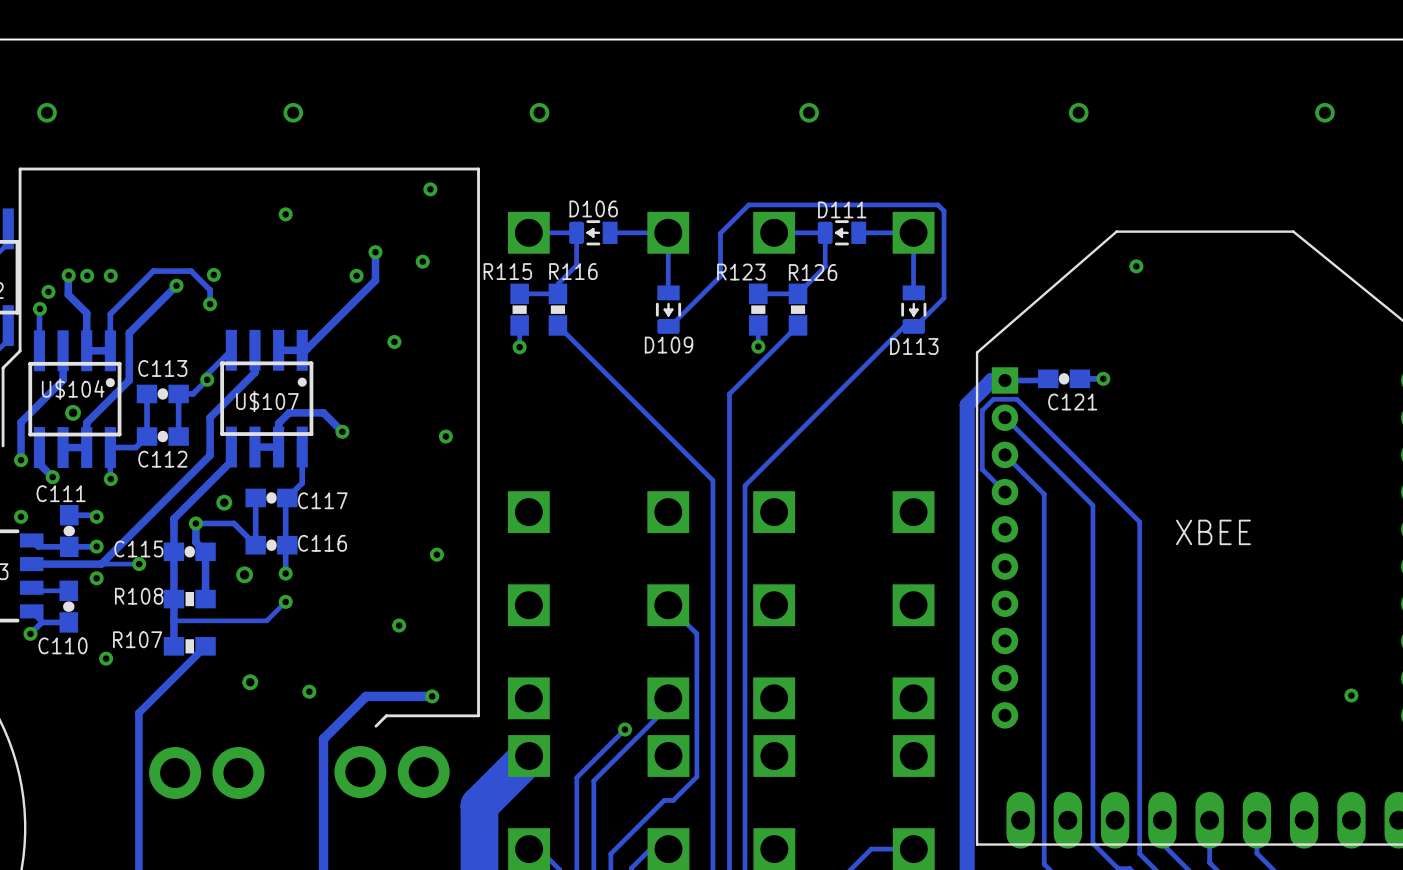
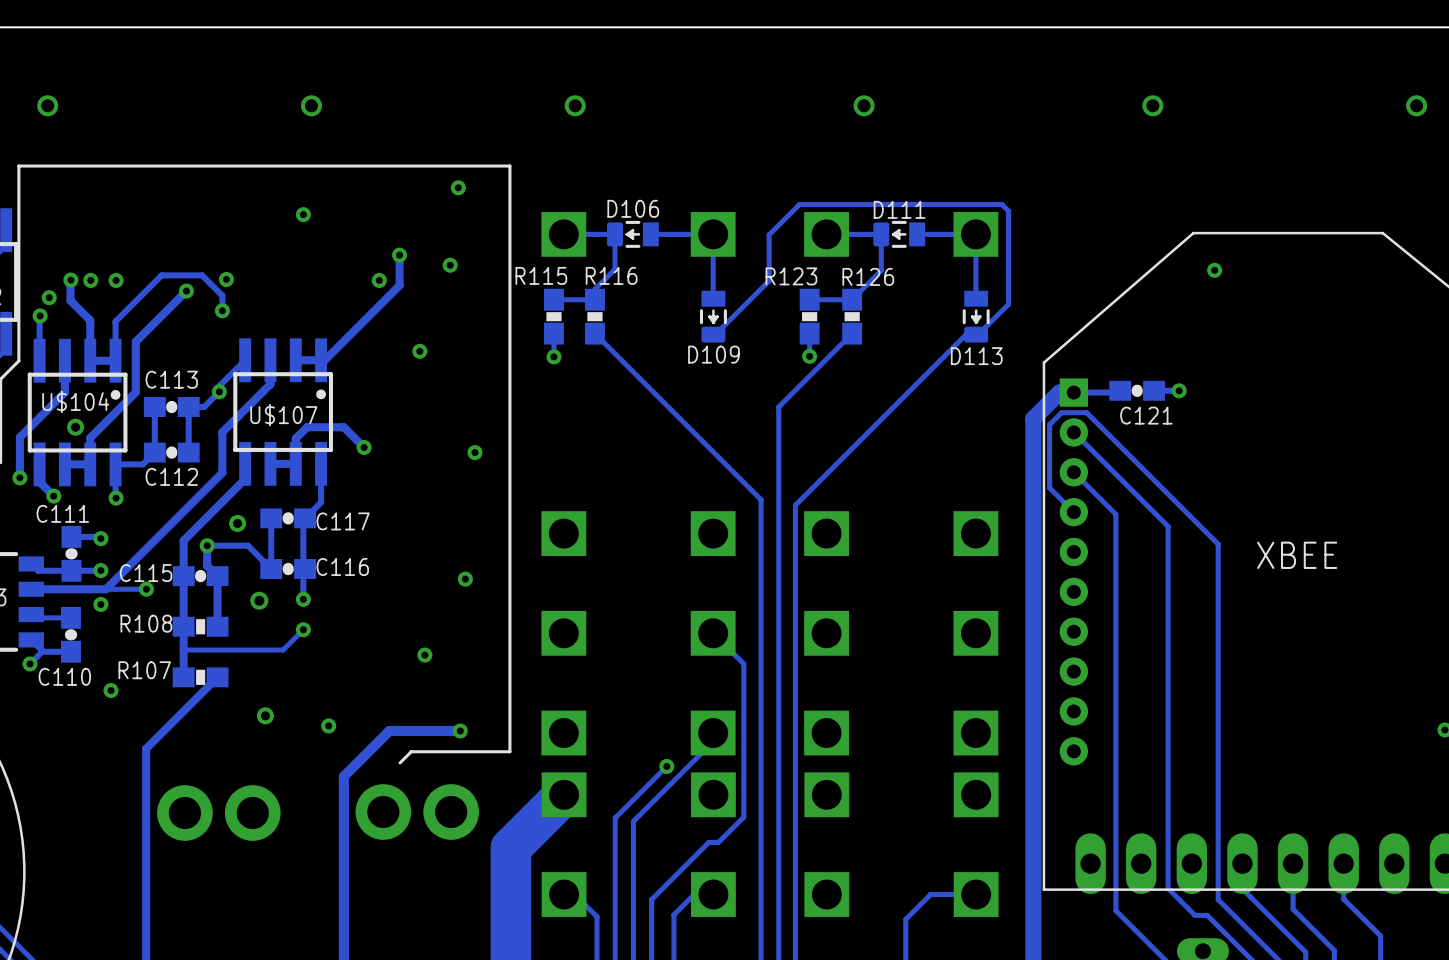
via: (21, 516) -> none

